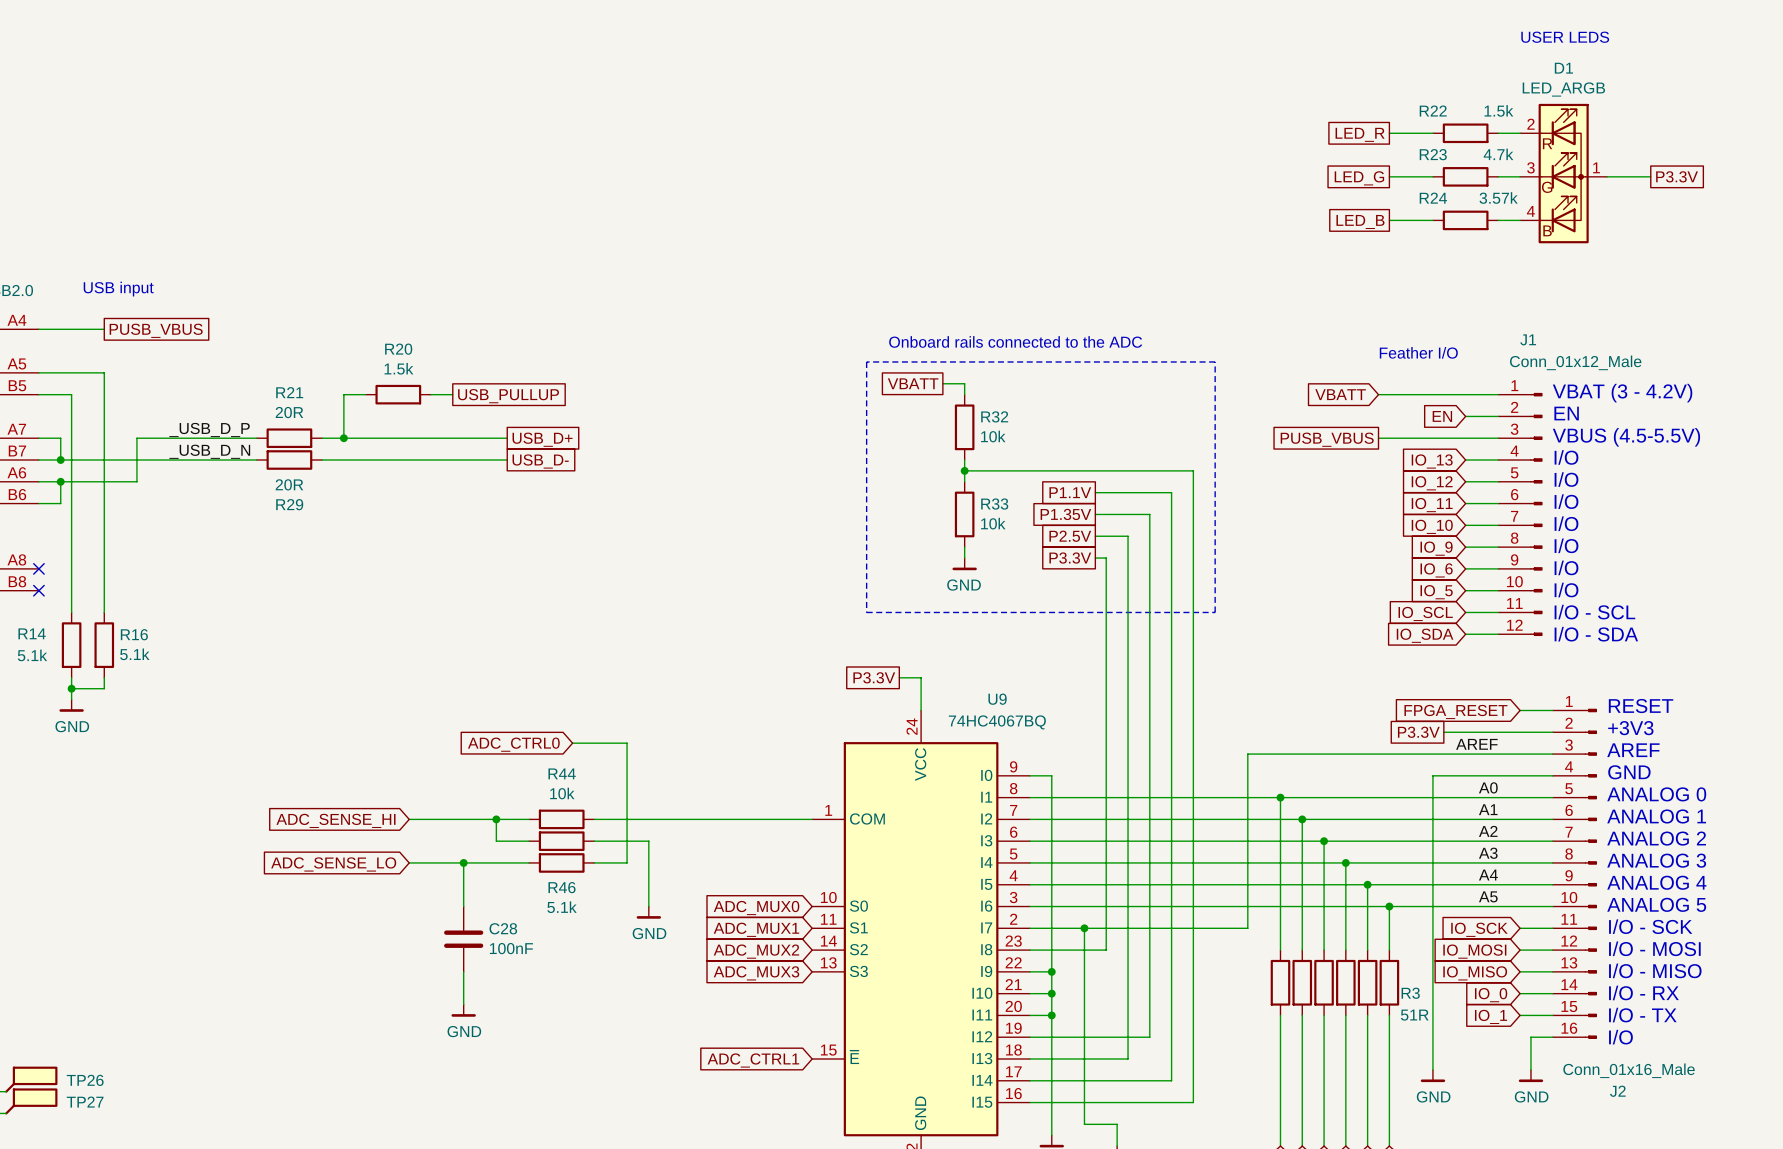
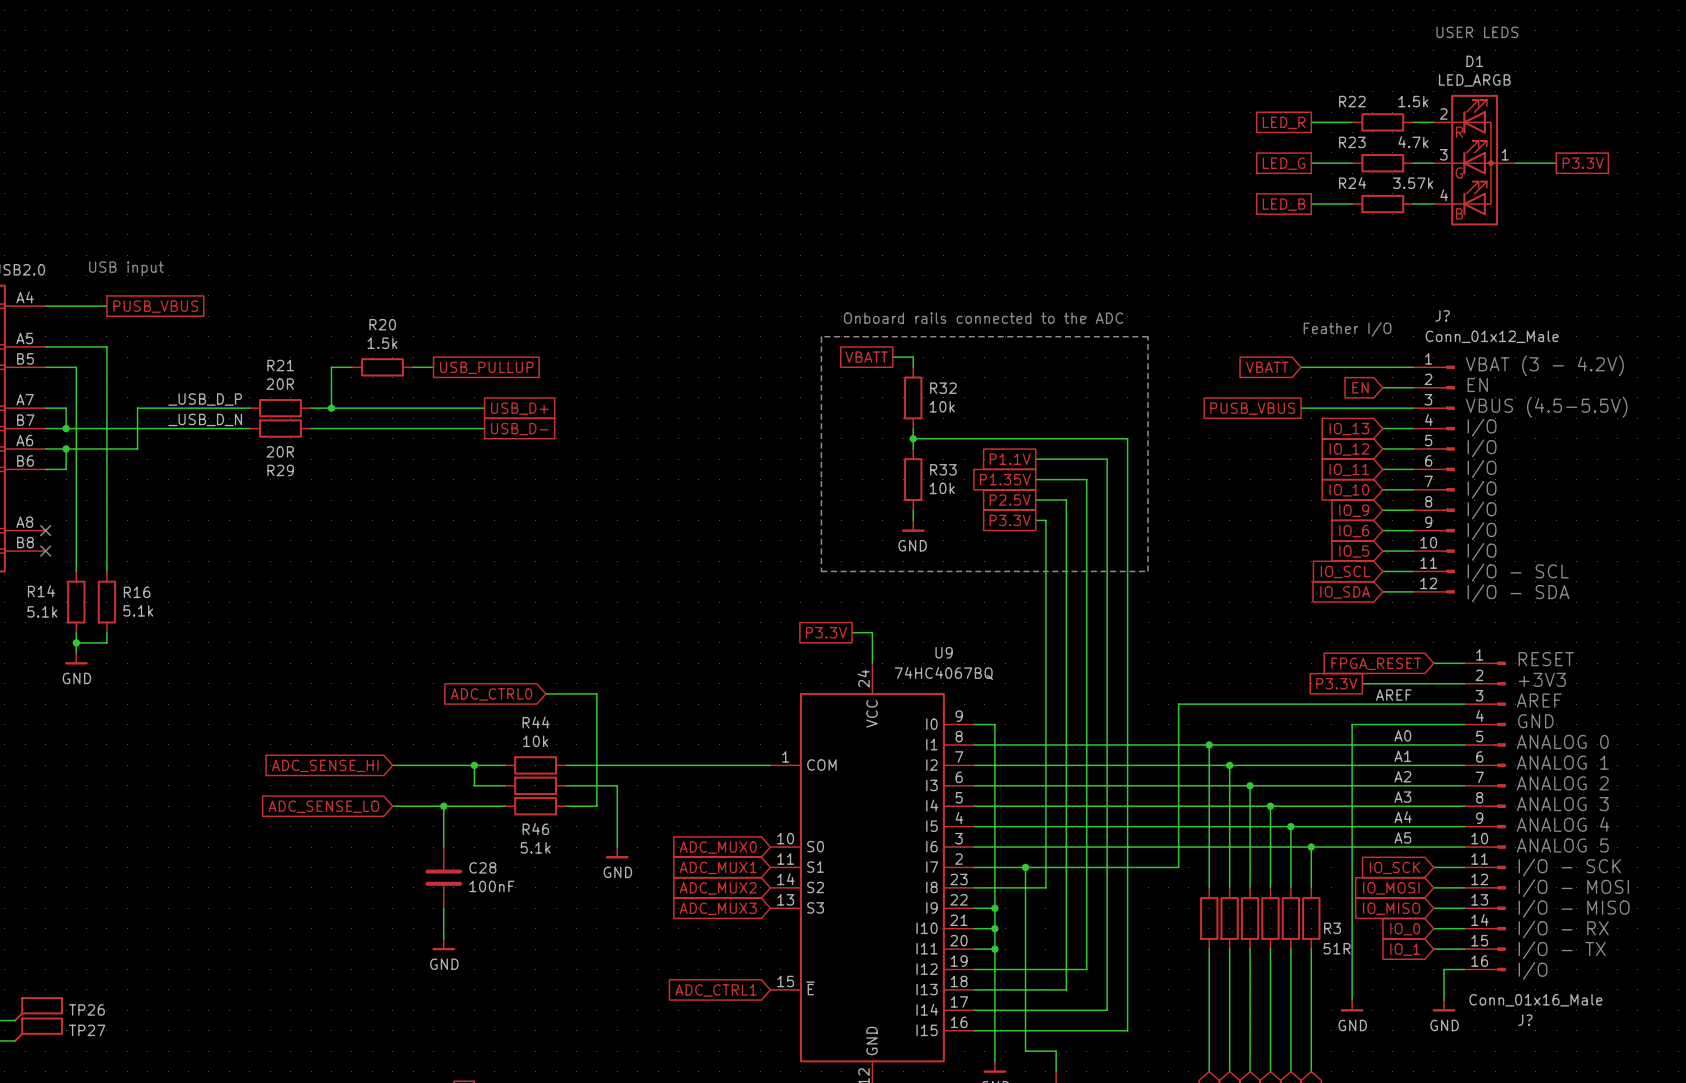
J1 name: J1 (1528, 339) -> J? (1442, 315)
J2 name: J2 (1617, 1091) -> J? (1525, 1020)

